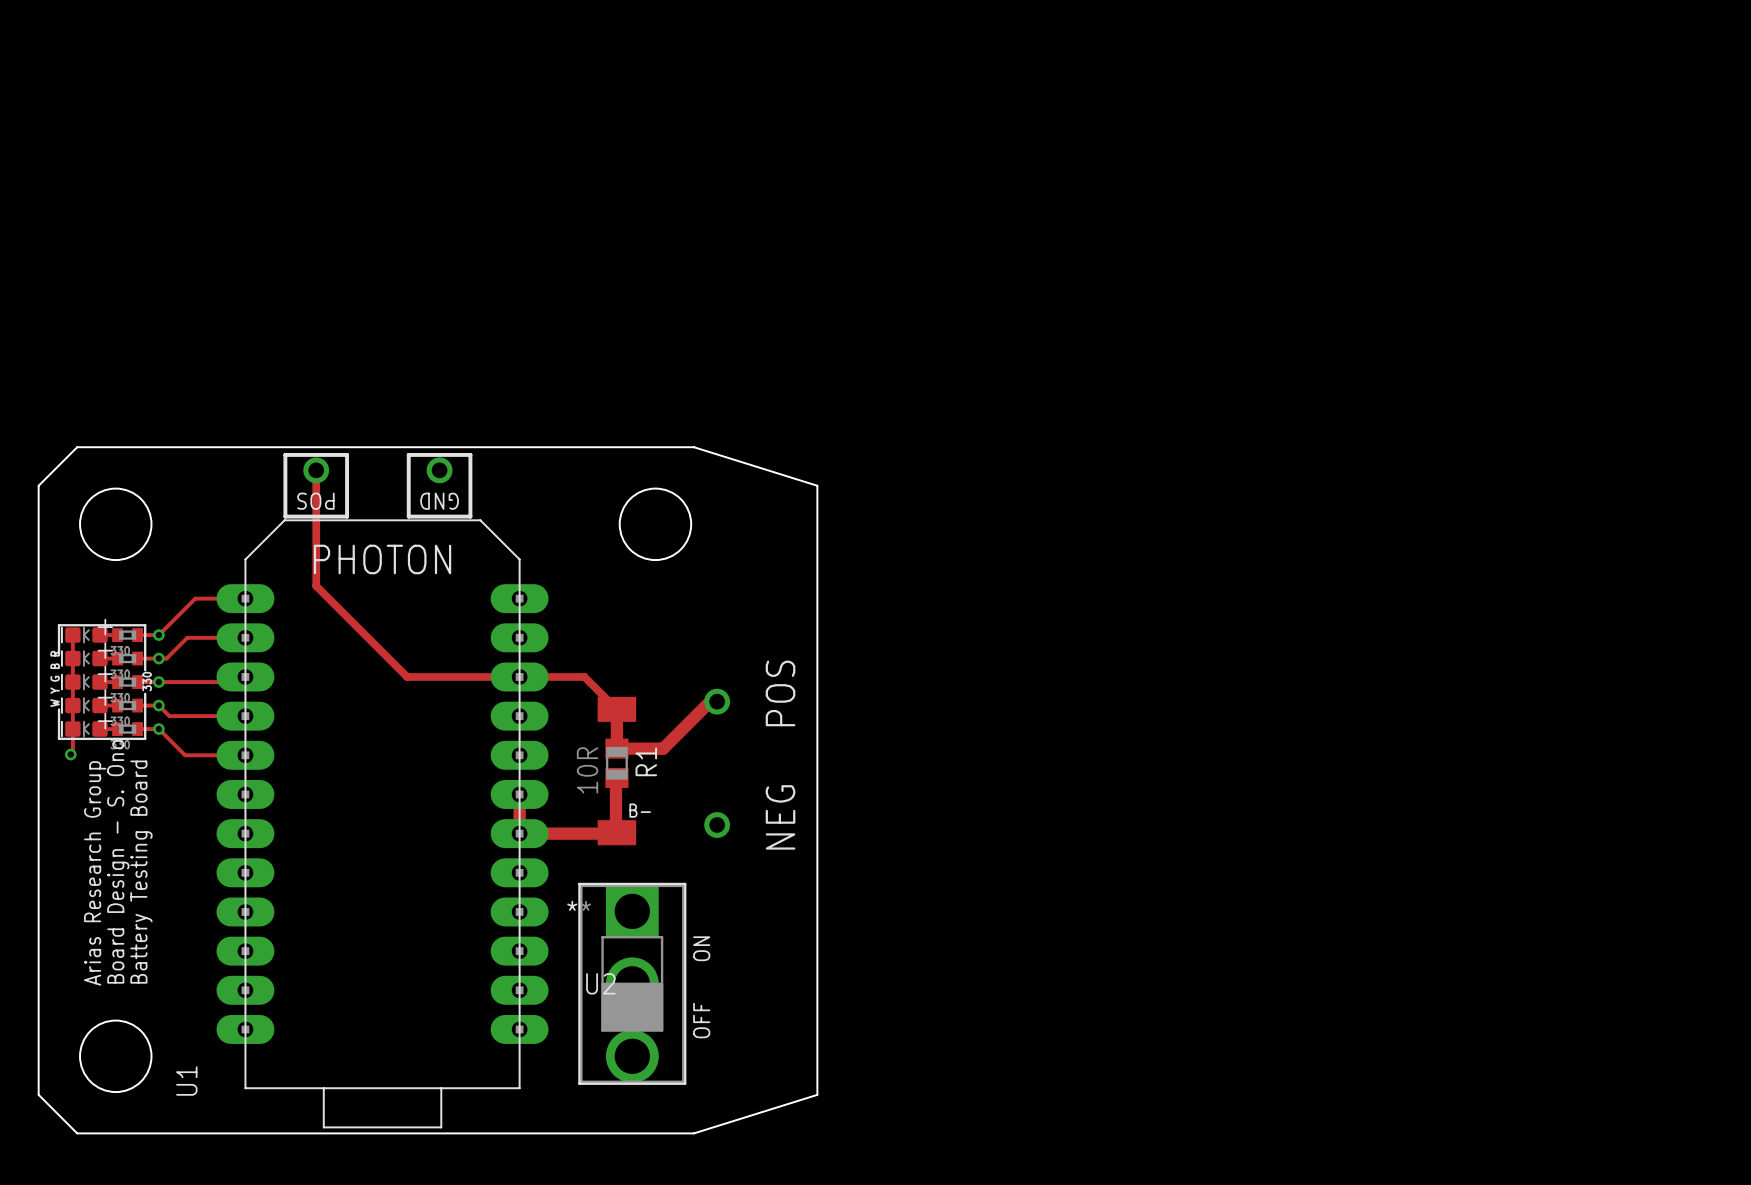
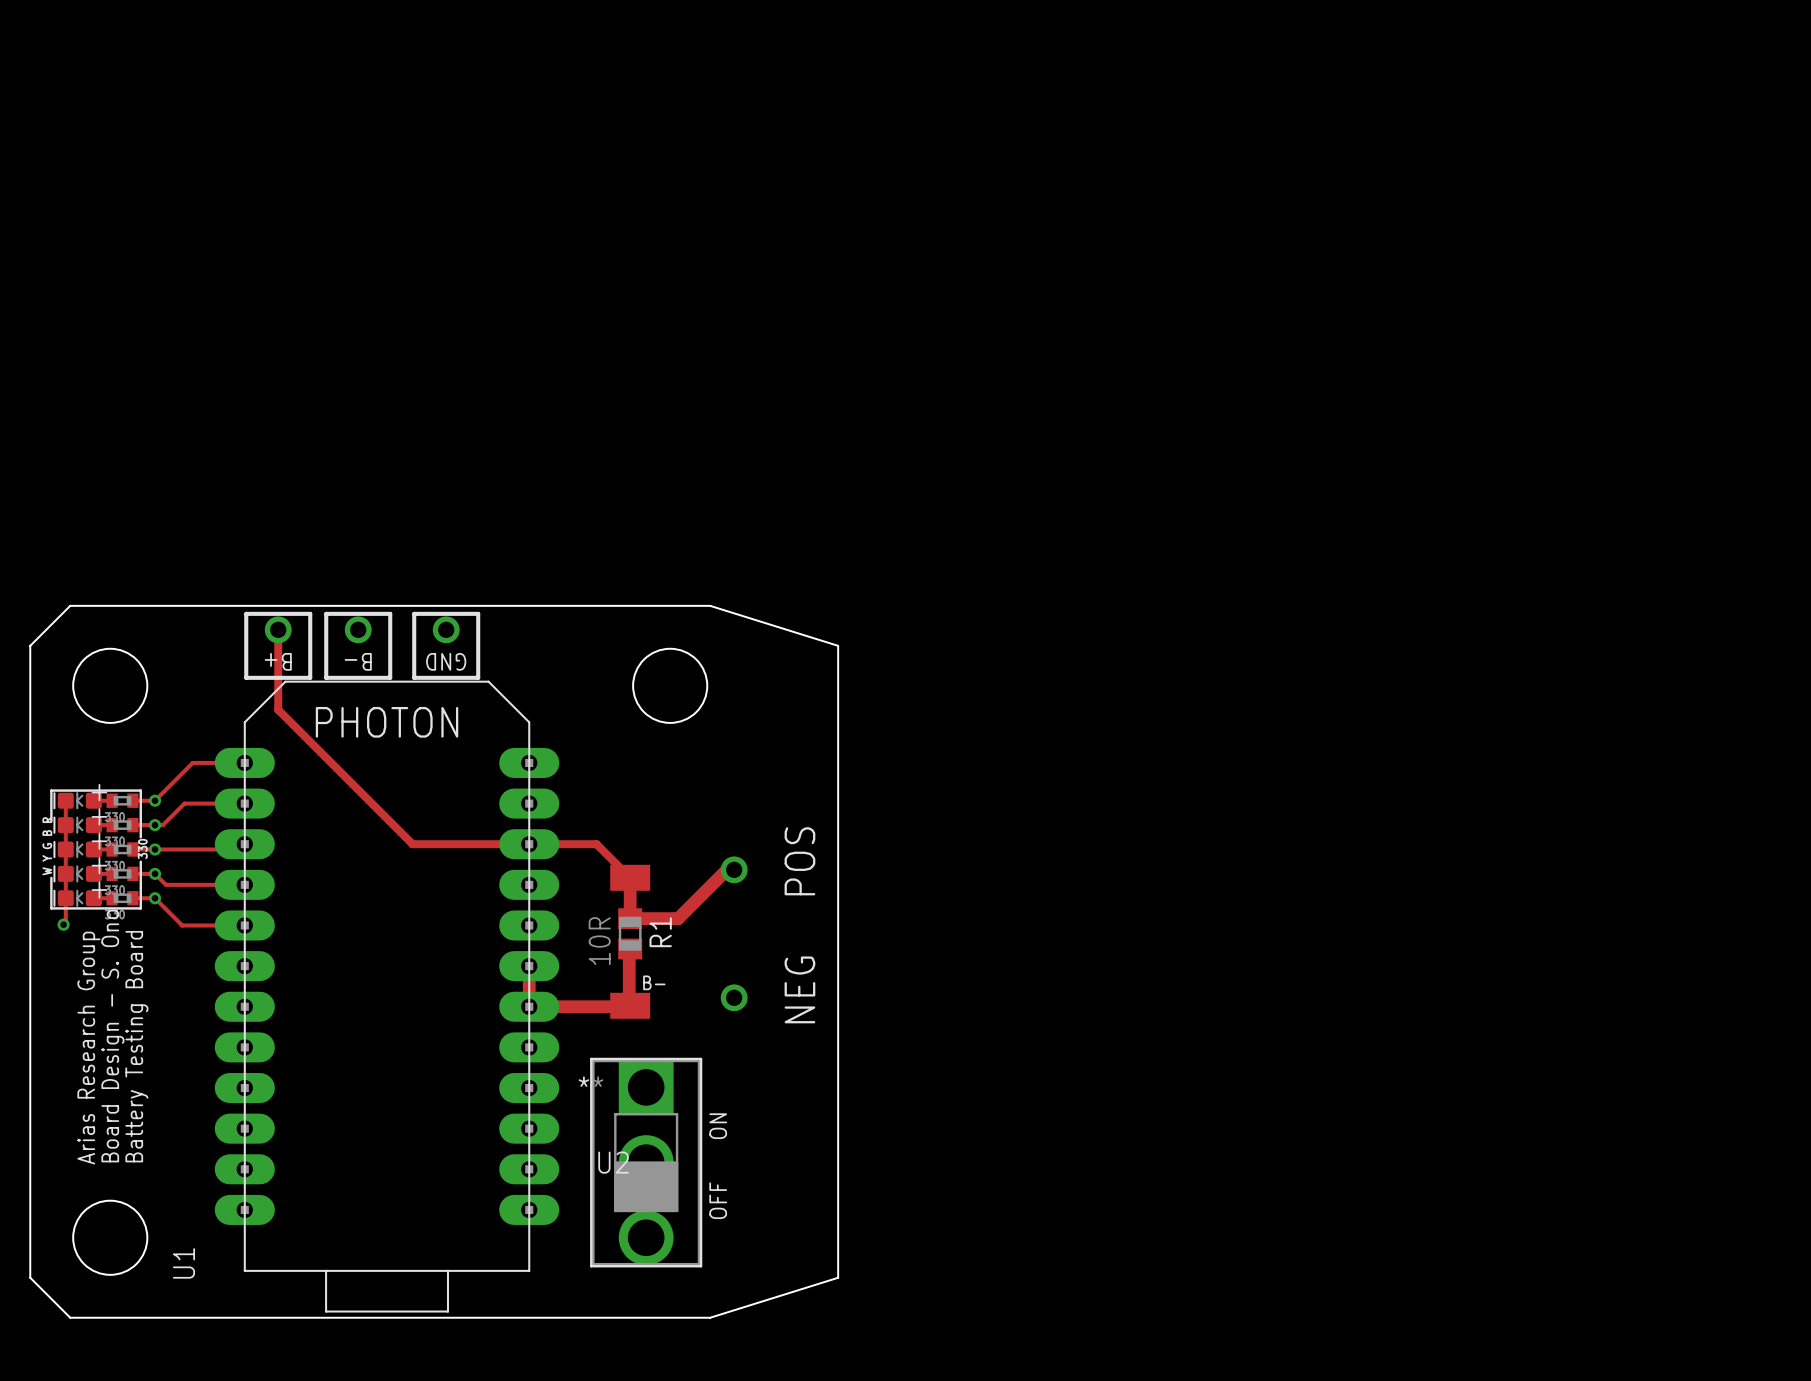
line: (285, 454) (285, 516) -> (286, 613) (246, 613) (246, 677) (286, 677)
line: (308, 454) (323, 454) -> (310, 613) (310, 677)
line: (347, 454) (347, 516) -> (350, 613) (390, 613) (390, 677) (350, 677)
part: none -> (278, 629)
track: (316, 470) (316, 586) -> (278, 629) (278, 709) (318, 749)
part: (316, 470) -> none
part: none -> (358, 629)
text: none -> B+ (278, 661)
text: POS (315, 501) -> none
text: none -> B- (358, 661)
line: (308, 516) (323, 516) -> (326, 613) (326, 677)

